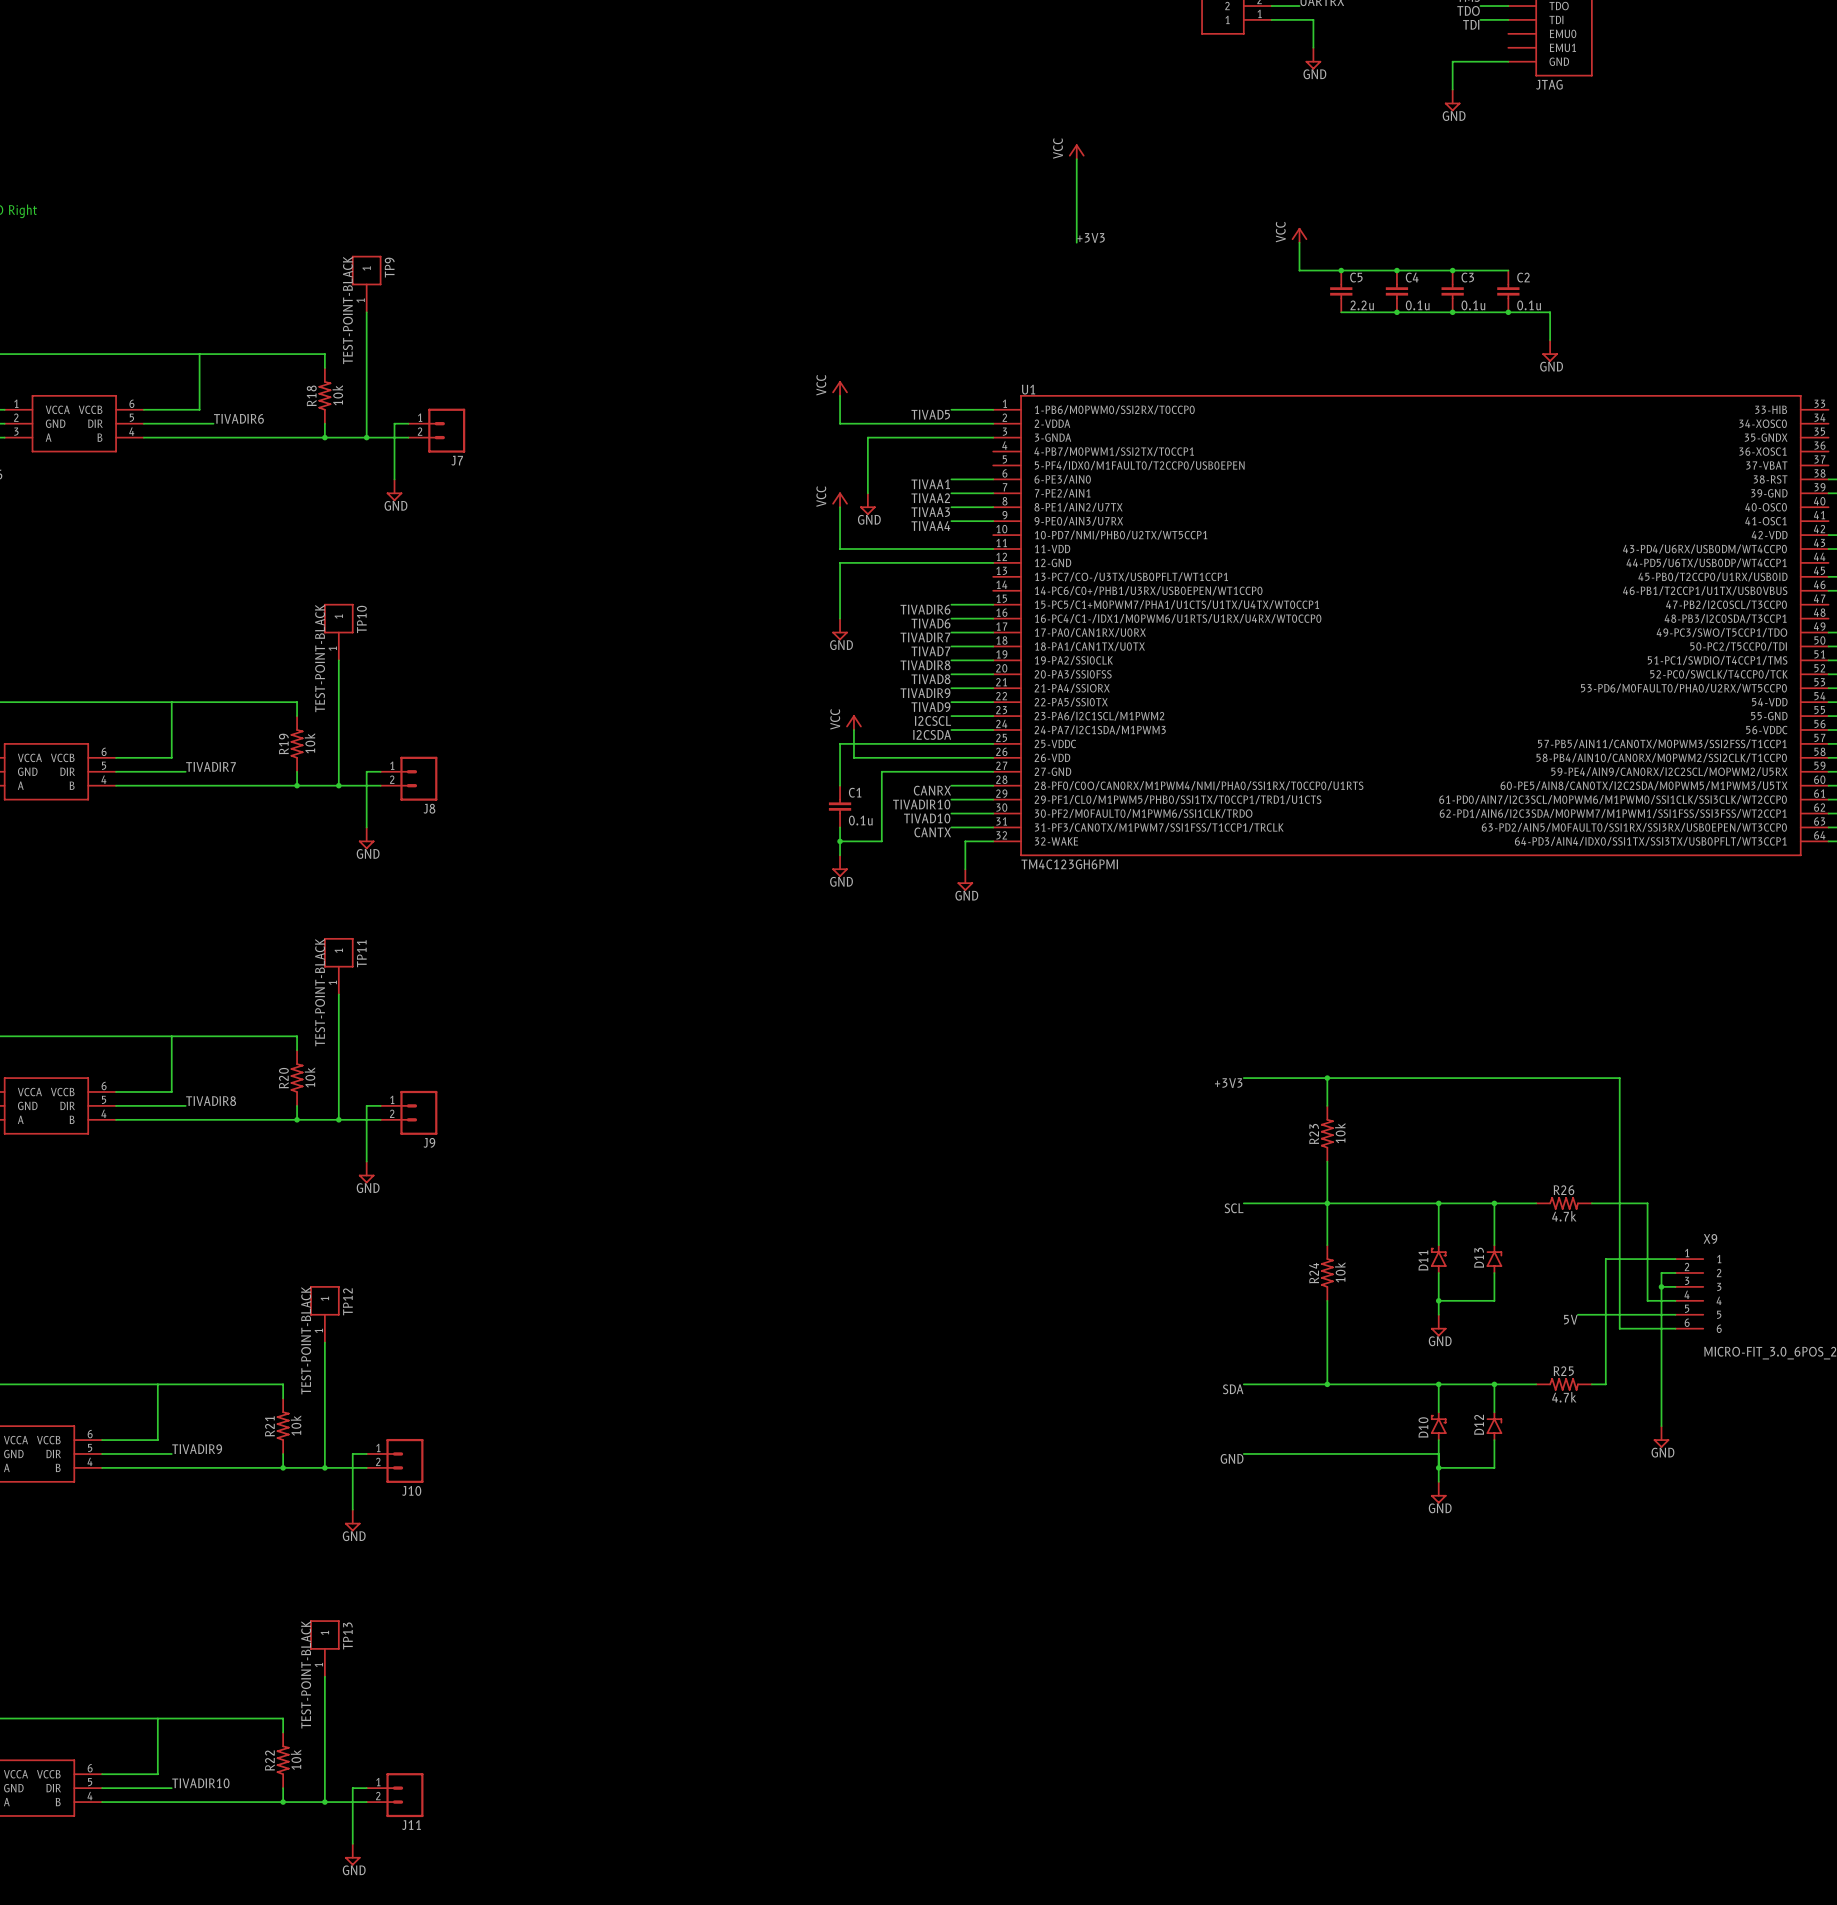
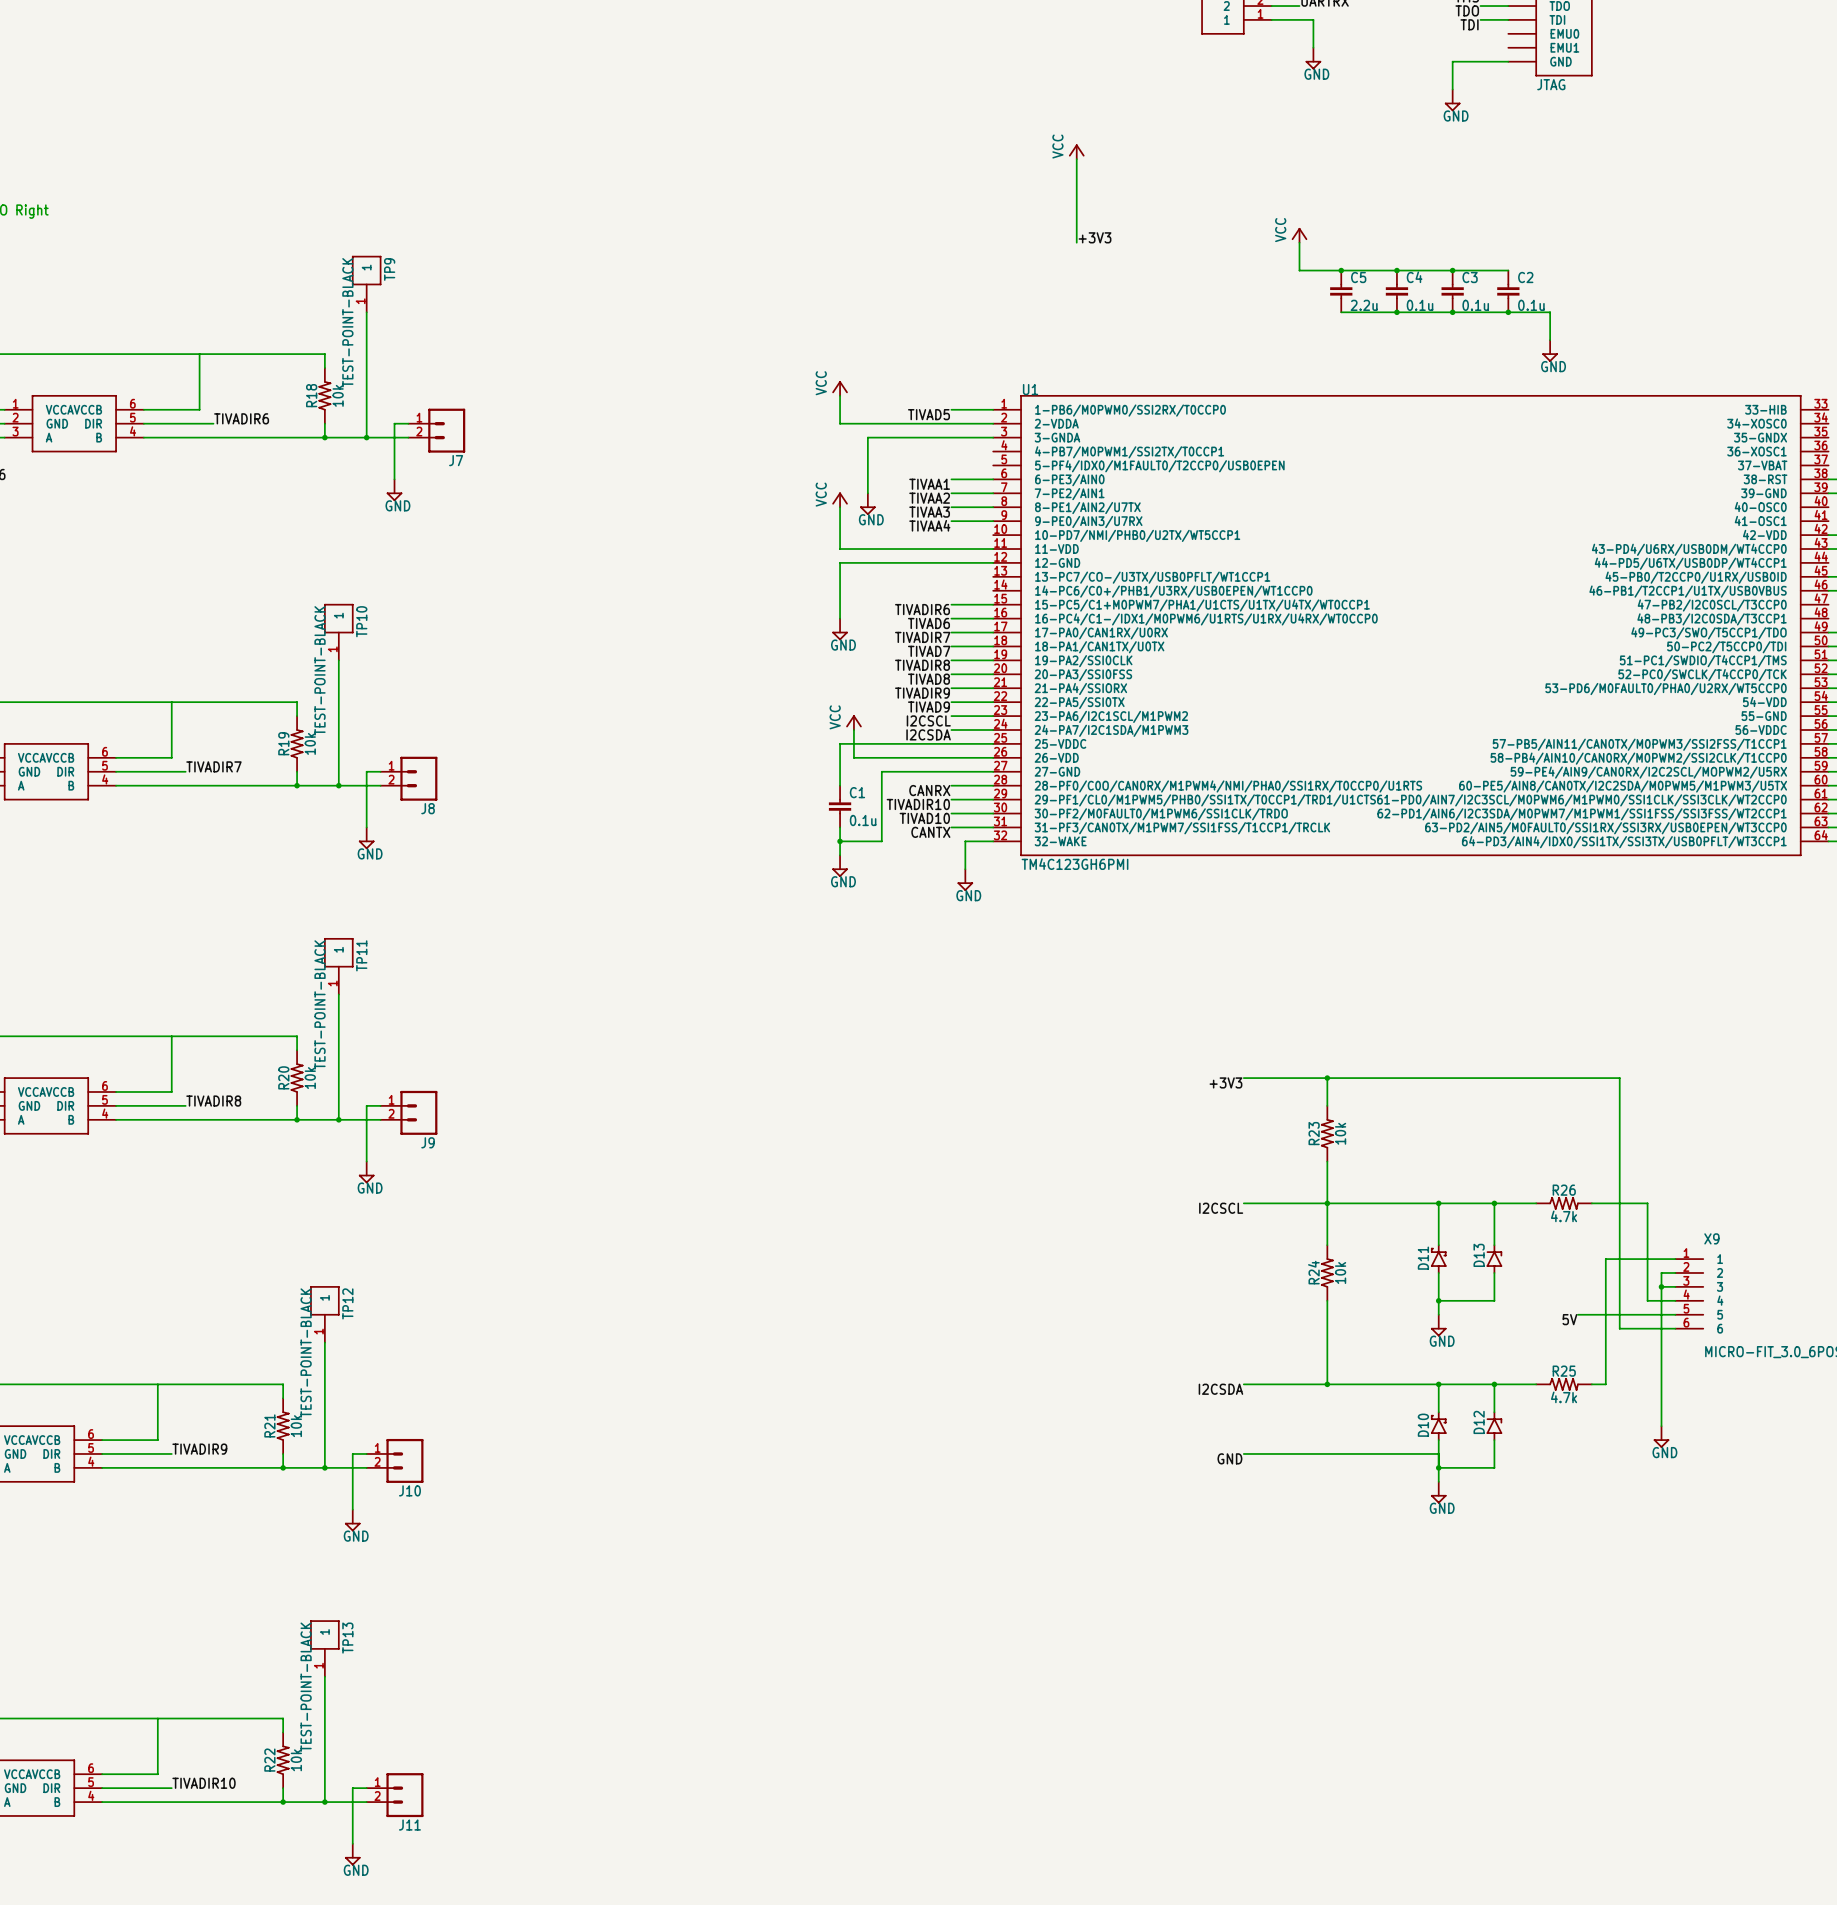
label: SCL (1234, 1208) -> I2CSCL (1221, 1208)
label: SDA (1233, 1389) -> I2CSDA (1220, 1389)

